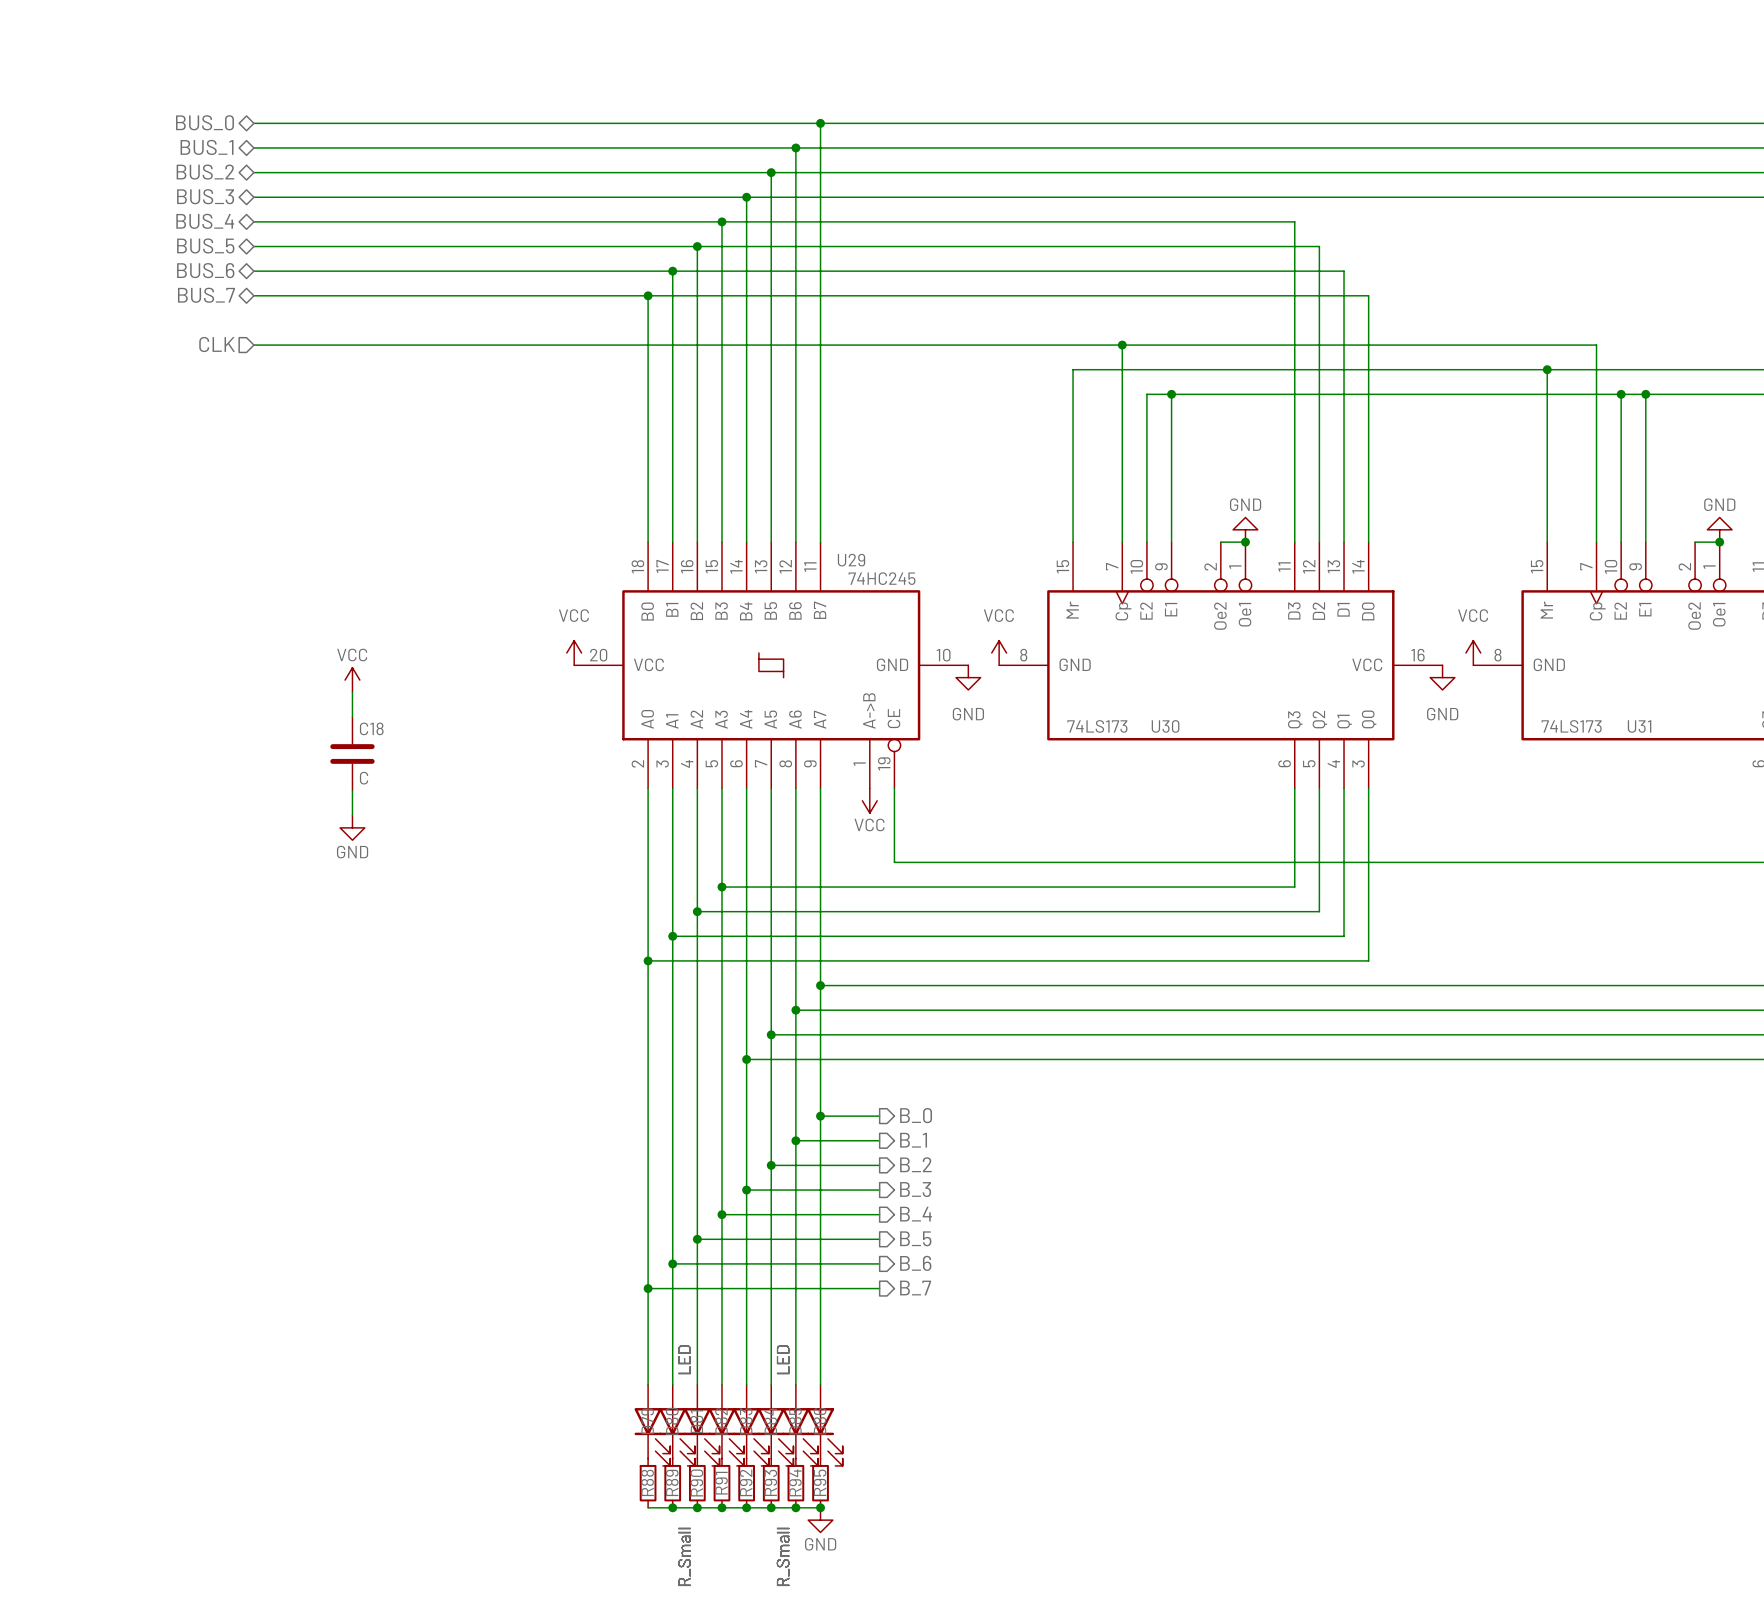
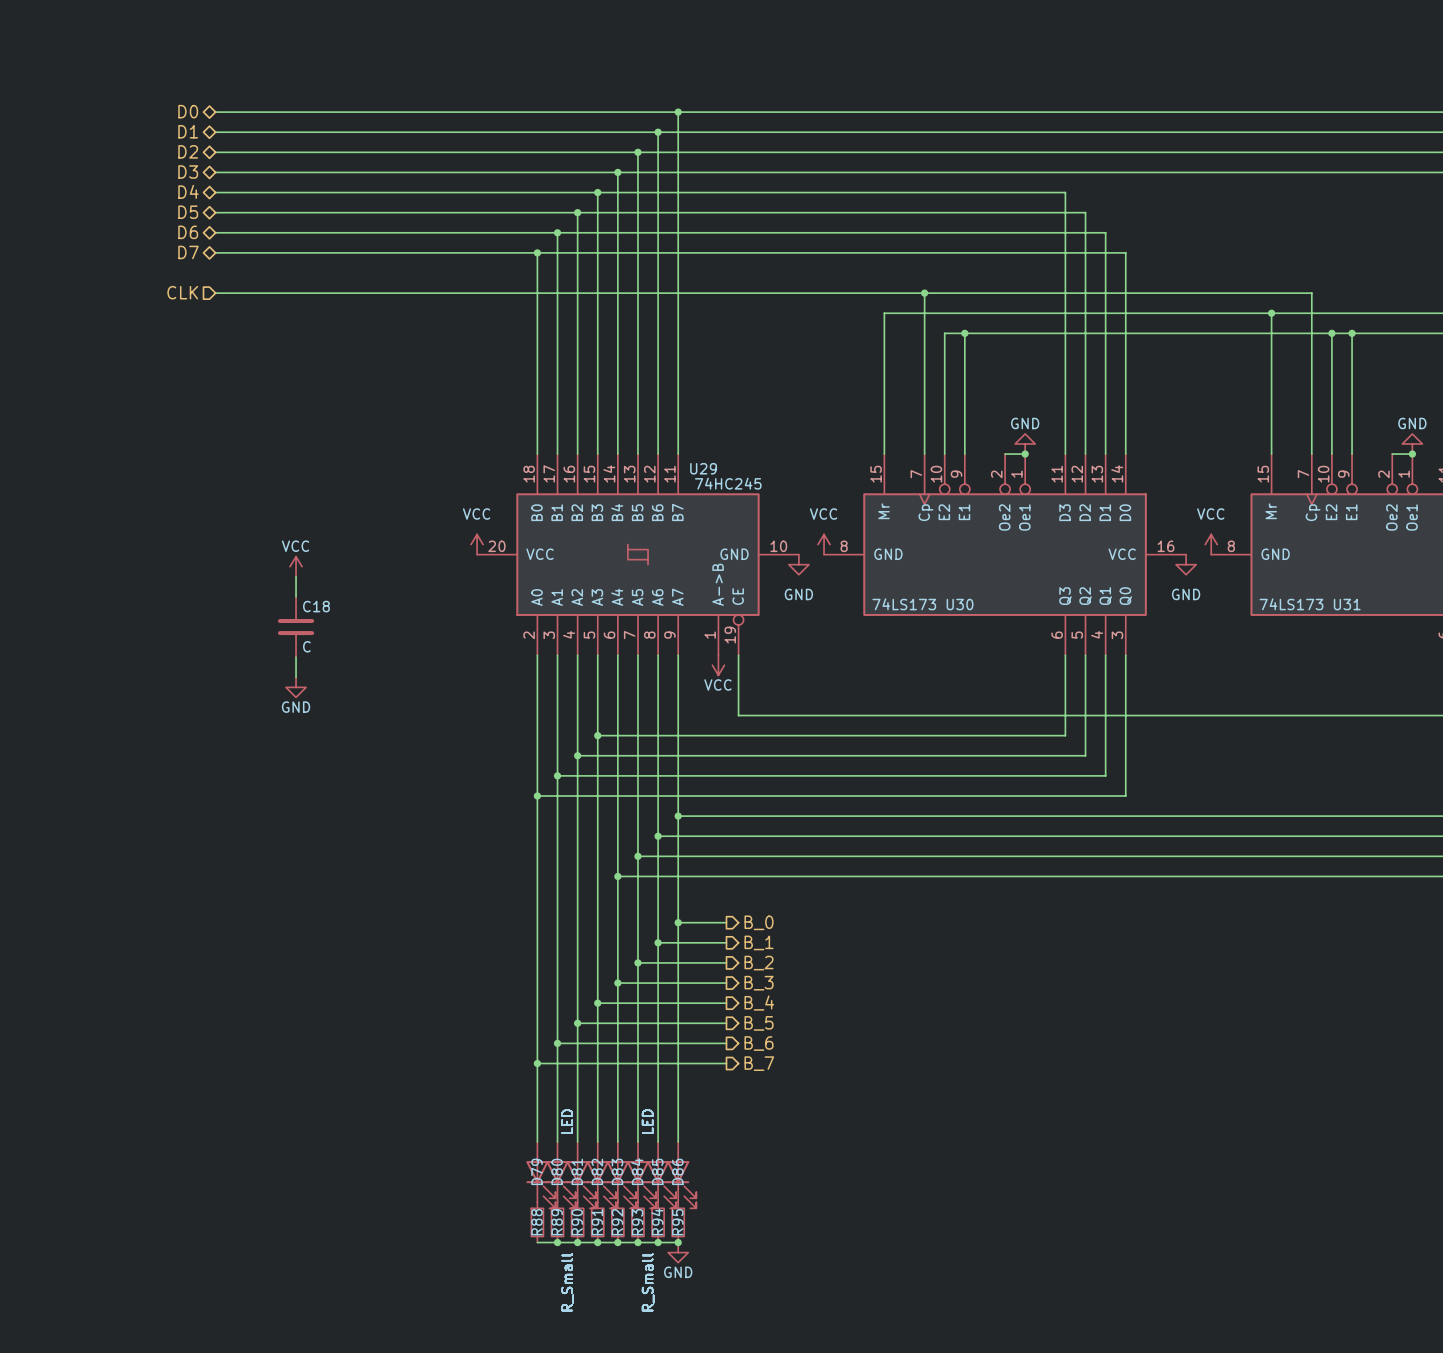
hierarchical label: BUS_0 (204, 122) -> D0 (188, 111)
hierarchical label: BUS_1 (207, 147) -> D1 (188, 131)
hierarchical label: BUS_2 (205, 172) -> D2 (188, 151)
hierarchical label: BUS_3 (205, 196) -> D3 (188, 171)
hierarchical label: BUS_4 (205, 221) -> D4 (188, 191)
hierarchical label: BUS_5 (205, 245) -> D5 (188, 212)
hierarchical label: BUS_6 (205, 270) -> D6 (188, 232)
hierarchical label: BUS_7 (206, 295) -> D7 (188, 252)

